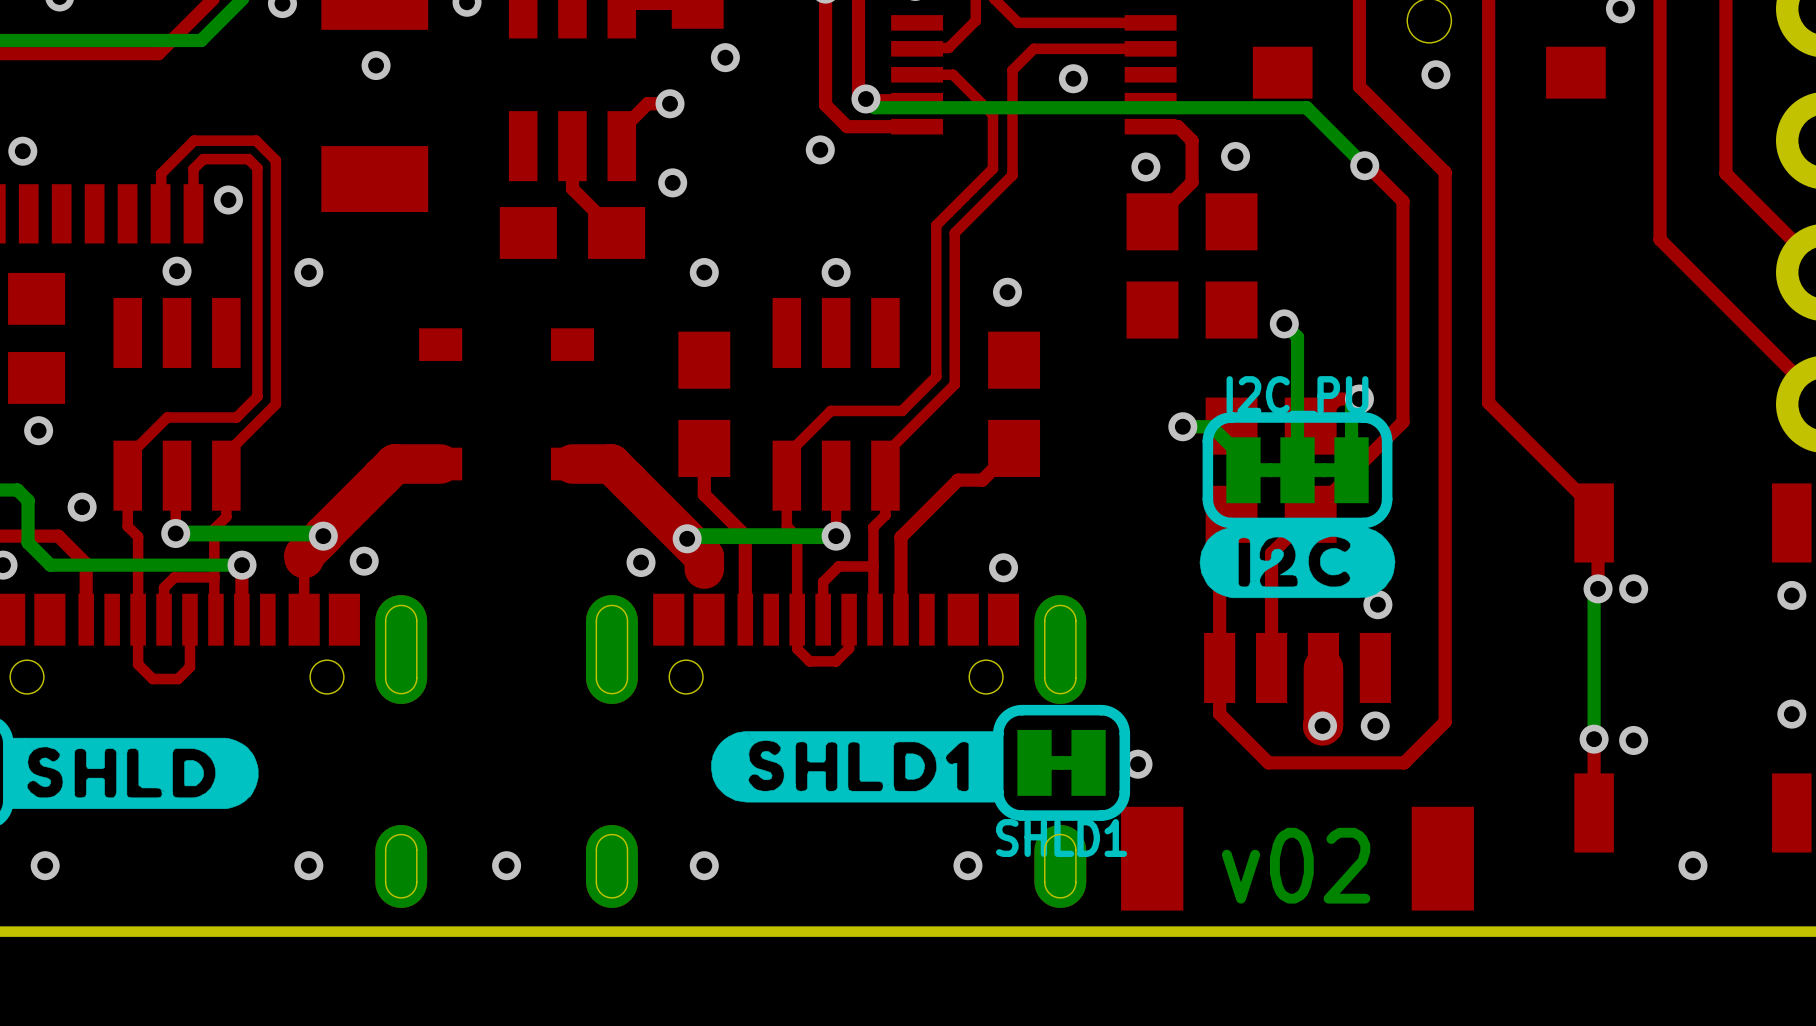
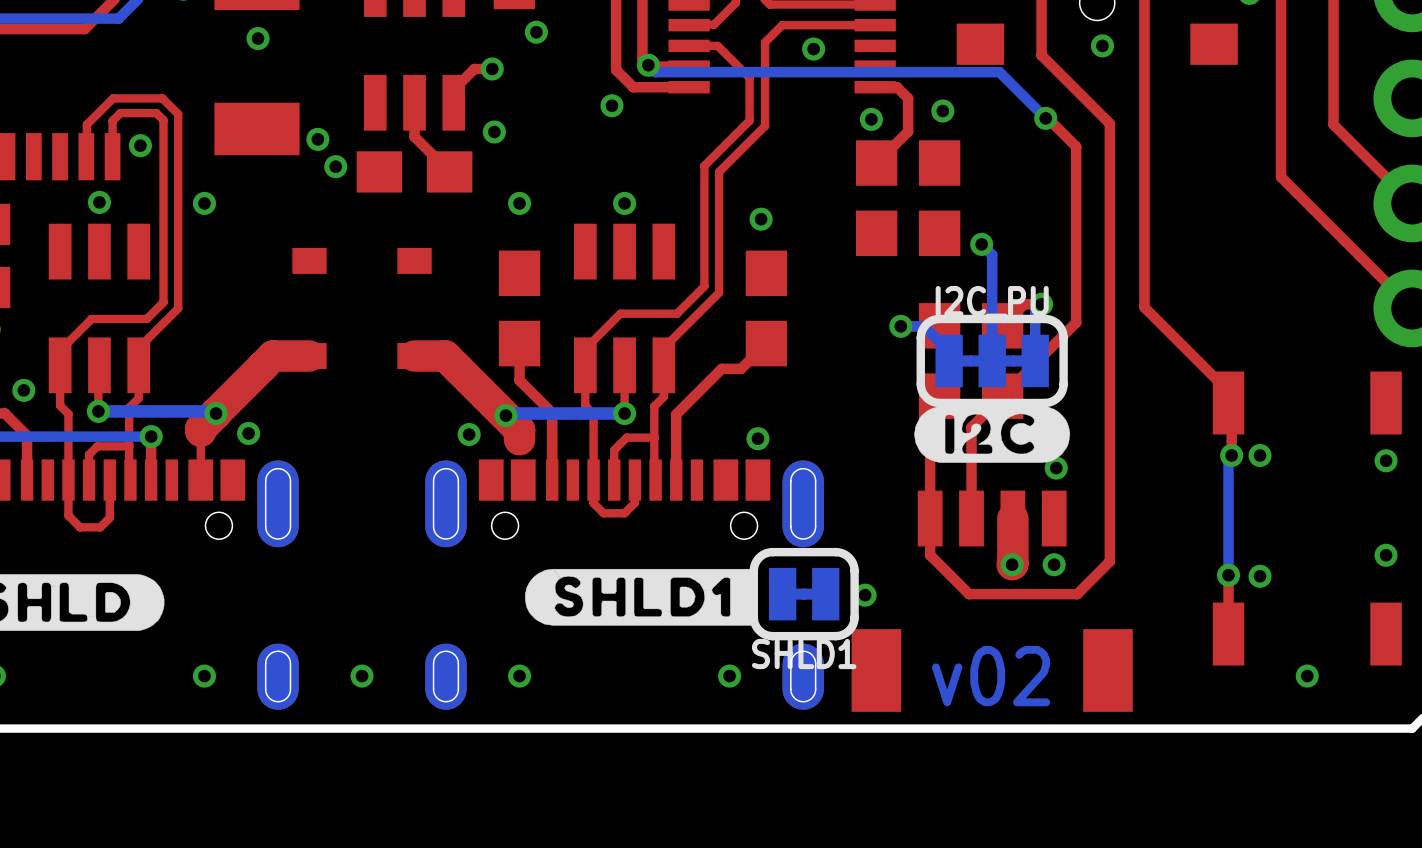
via: none -> (317, 139)
via: none -> (335, 166)

